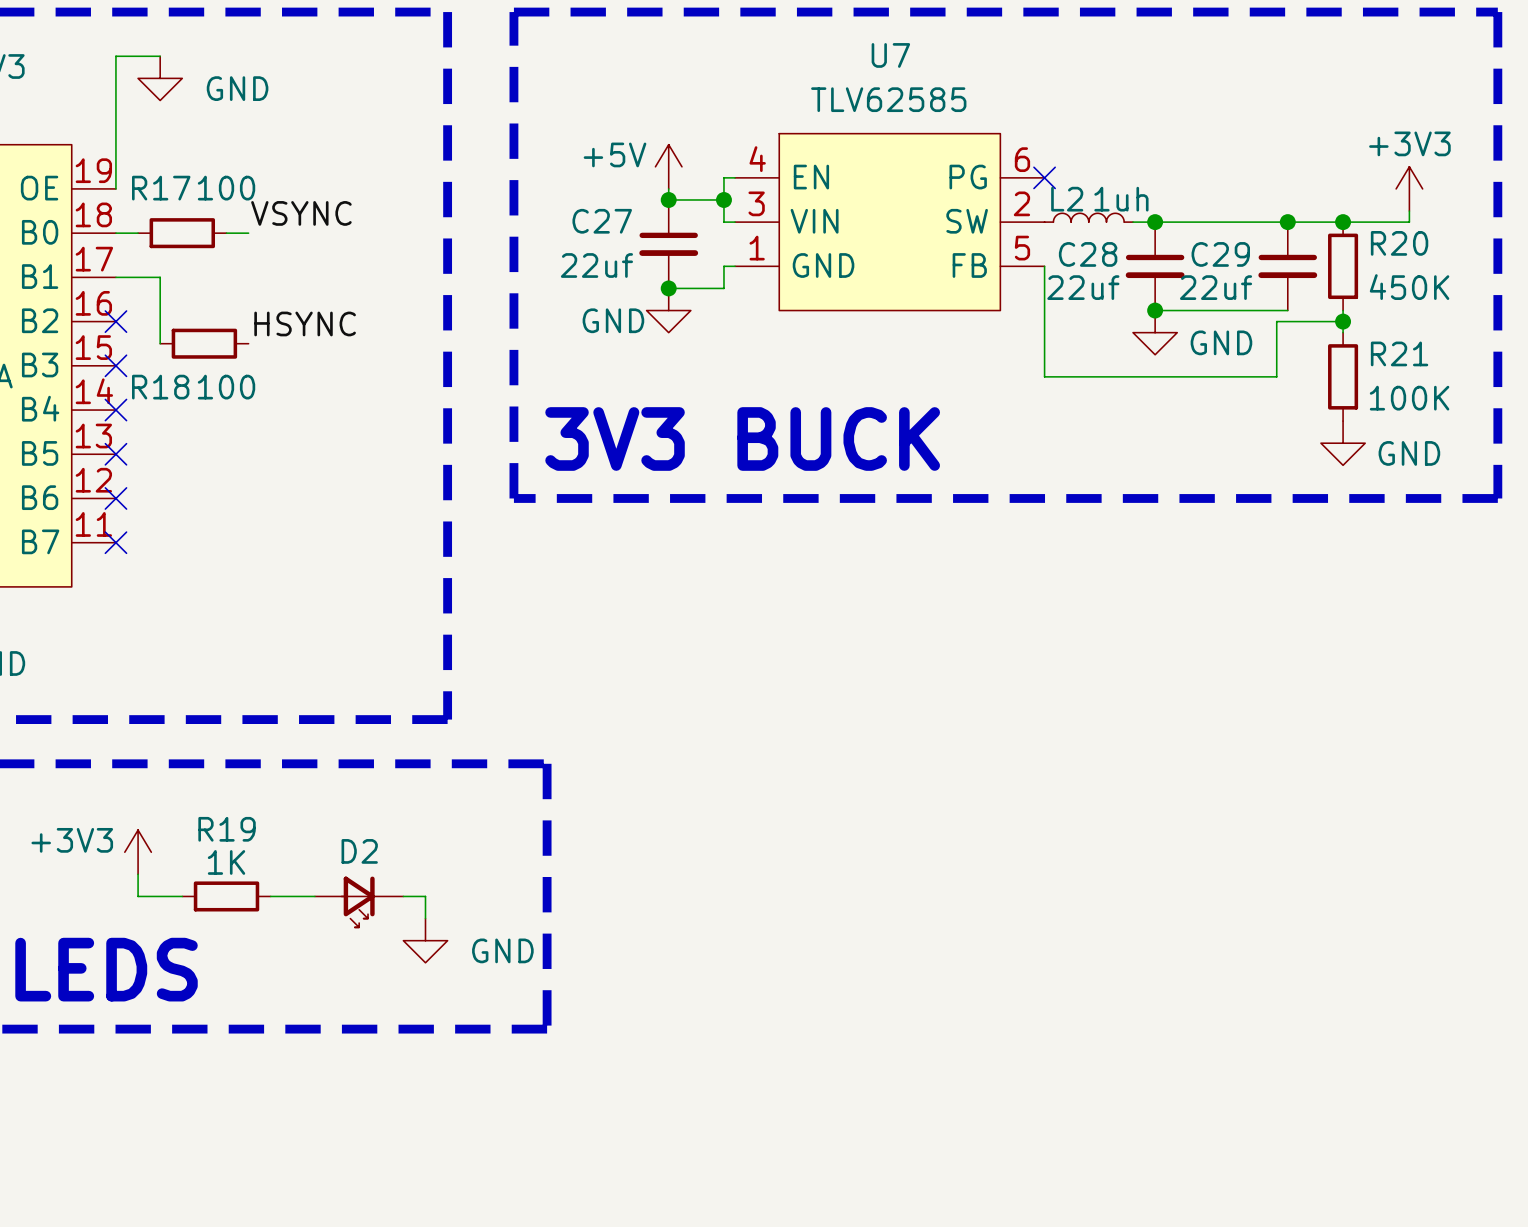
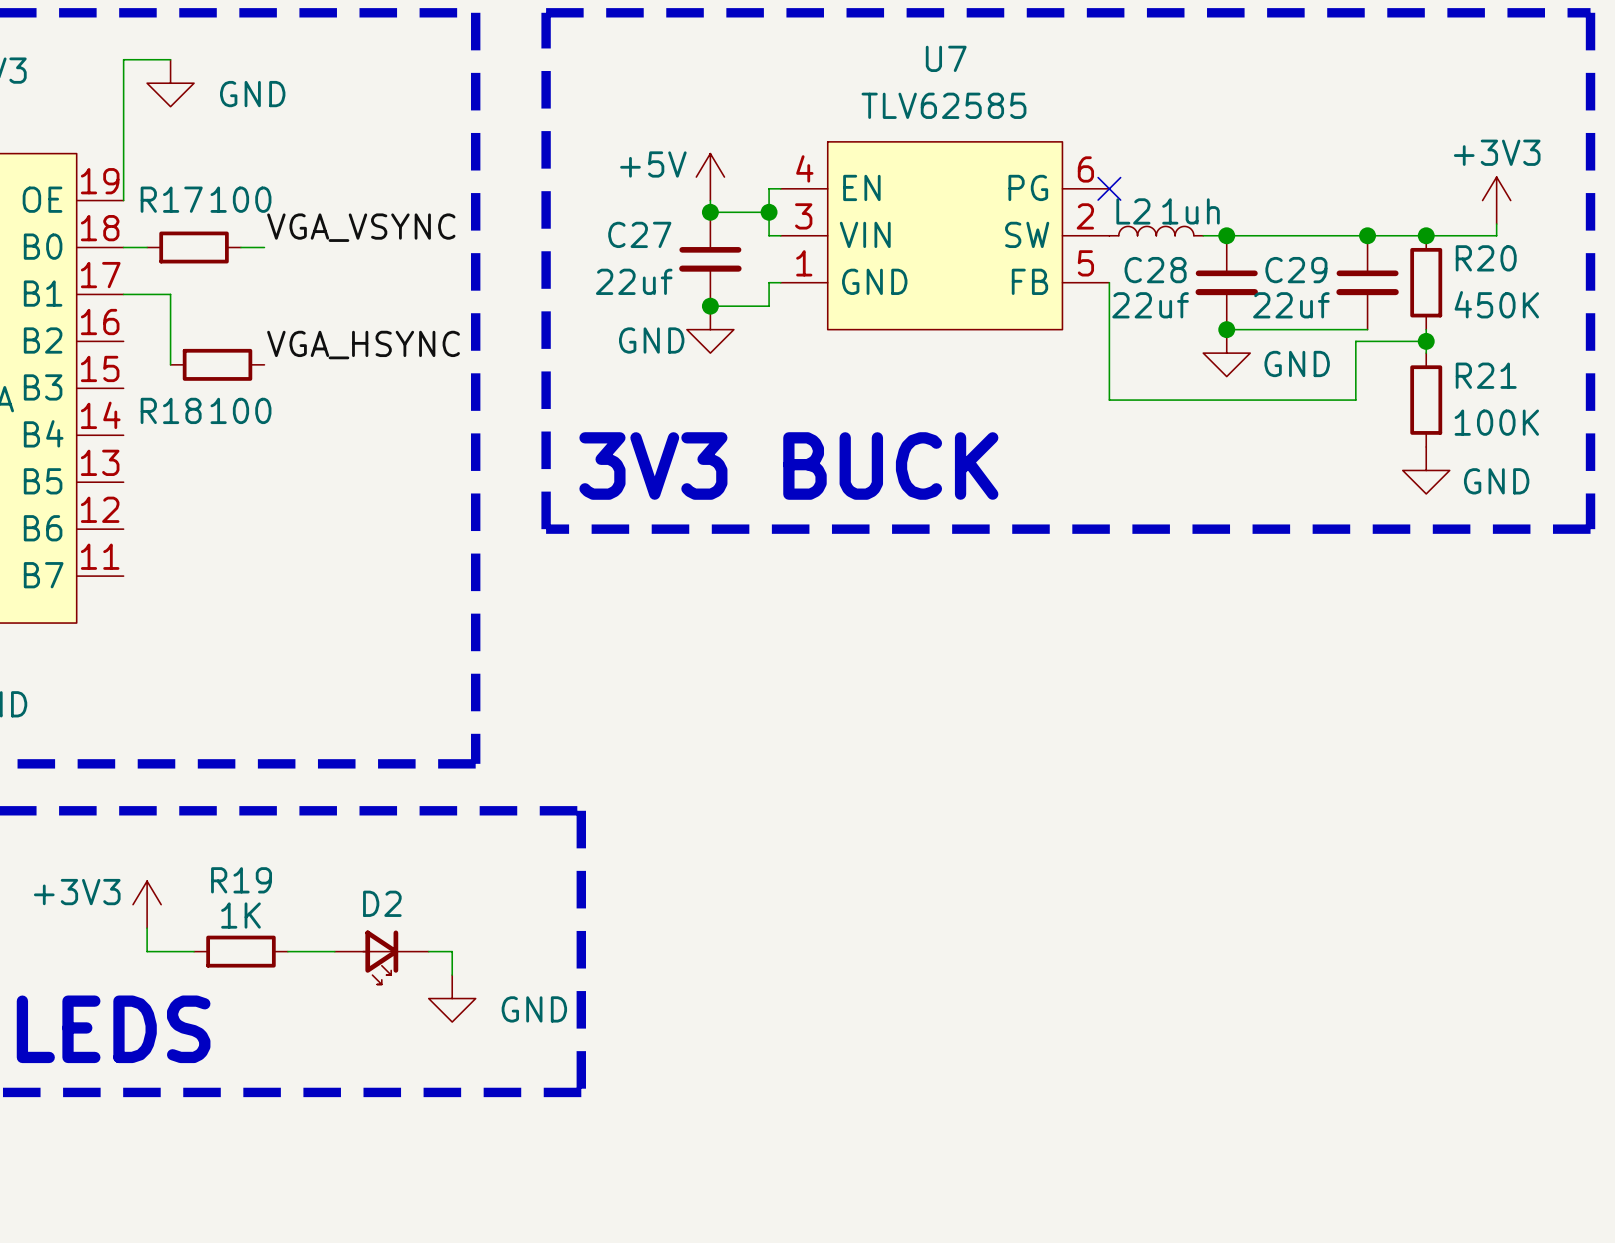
label: VSYNC (301, 213) -> VGA_VSYNC (361, 227)
no-connect mark: (115, 321) -> none
label: HSYNC (305, 323) -> VGA_HSYNC (363, 345)
no-connect mark: (115, 365) -> none
no-connect mark: (115, 410) -> none
no-connect mark: (115, 454) -> none
no-connect mark: (115, 498) -> none
no-connect mark: (115, 542) -> none

